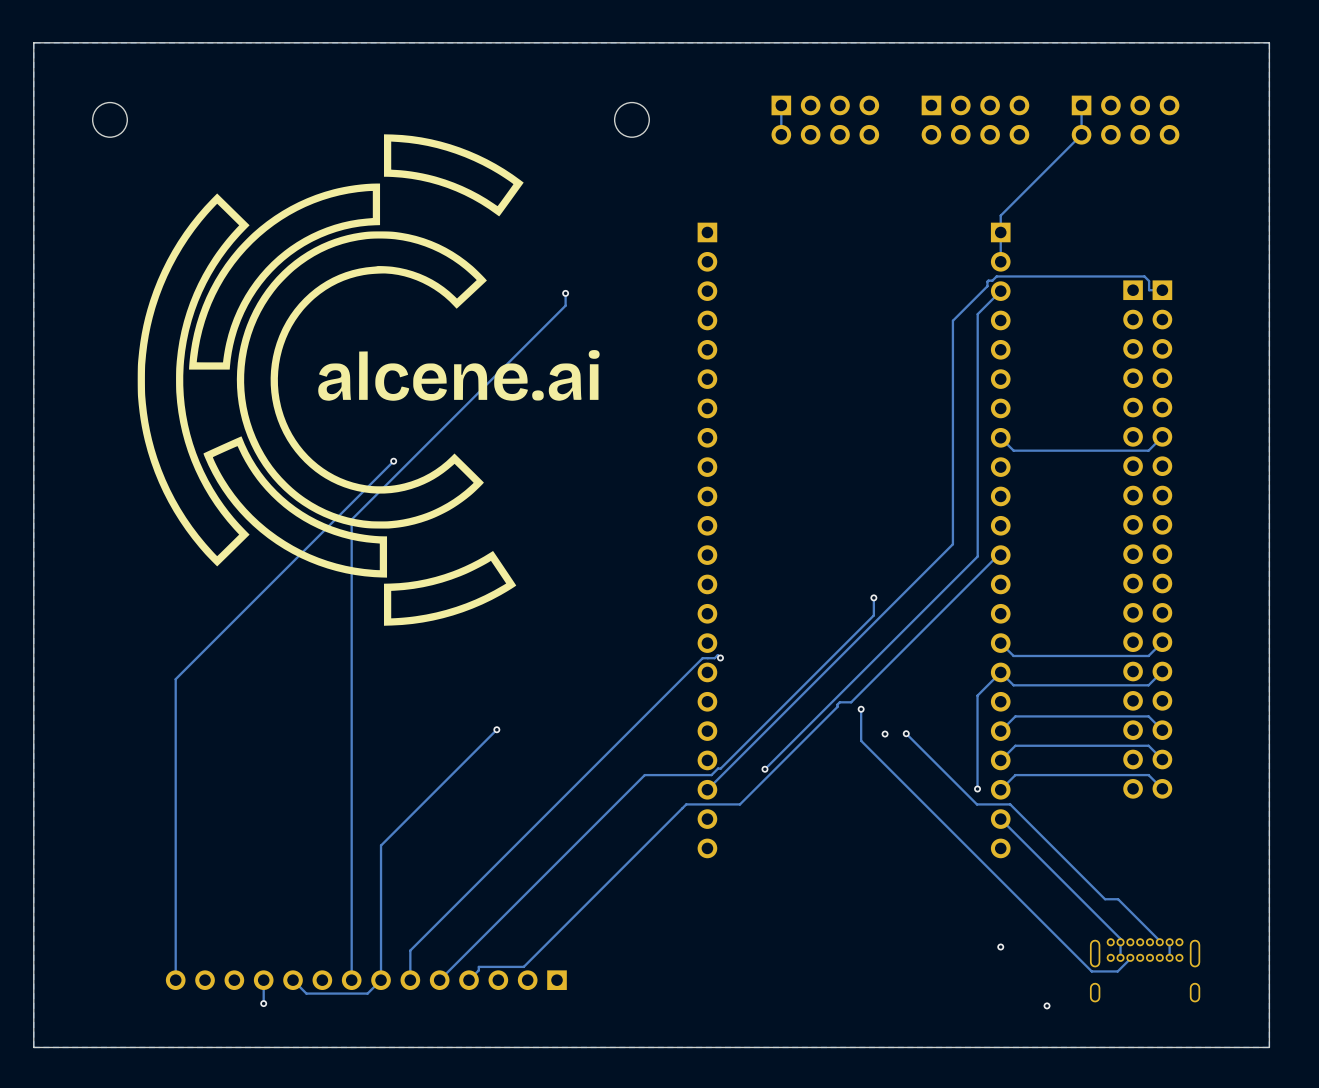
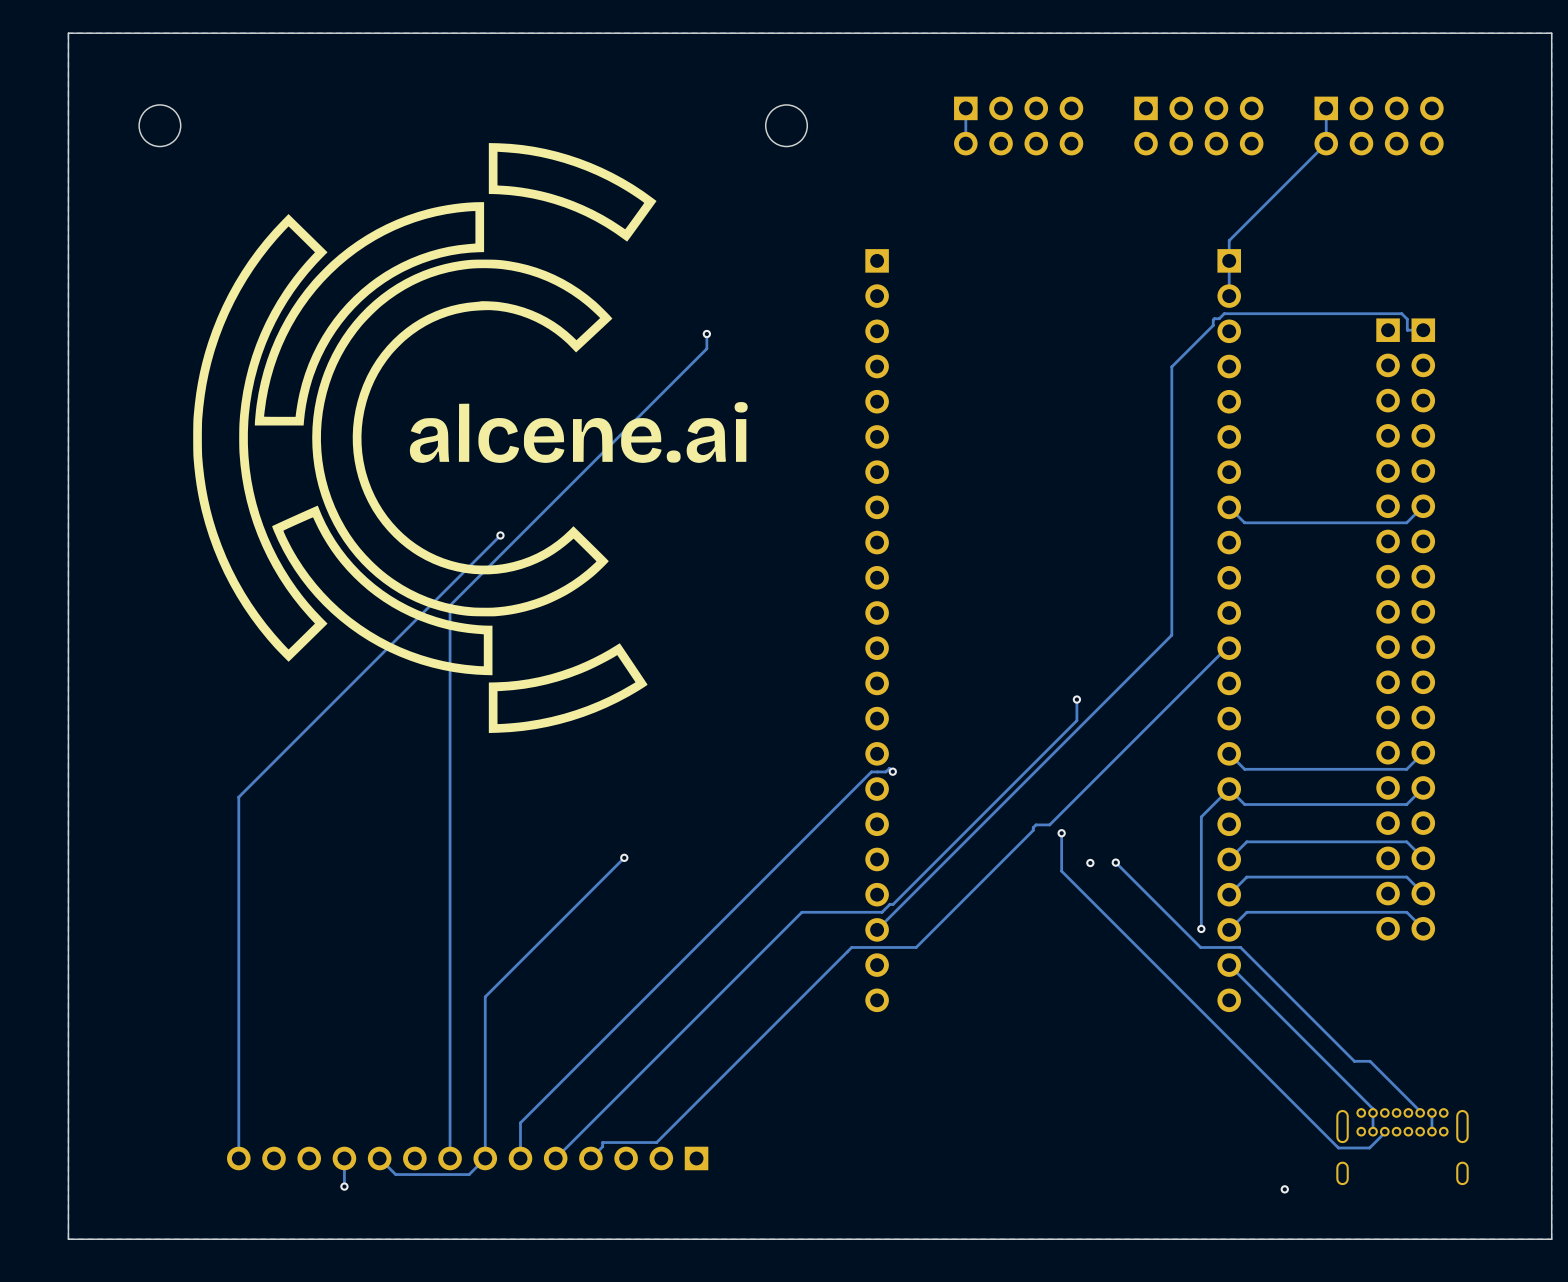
track: (1000, 291) (977, 314) (977, 556) (764, 769) -> none
via: (764, 769) -> none
via: (1000, 947) -> none

